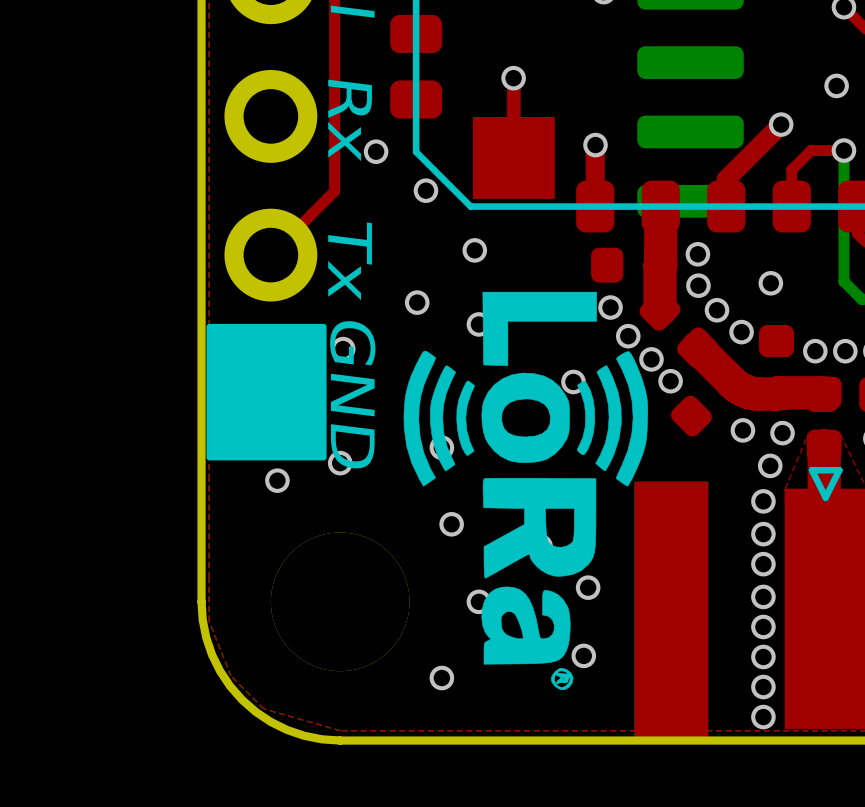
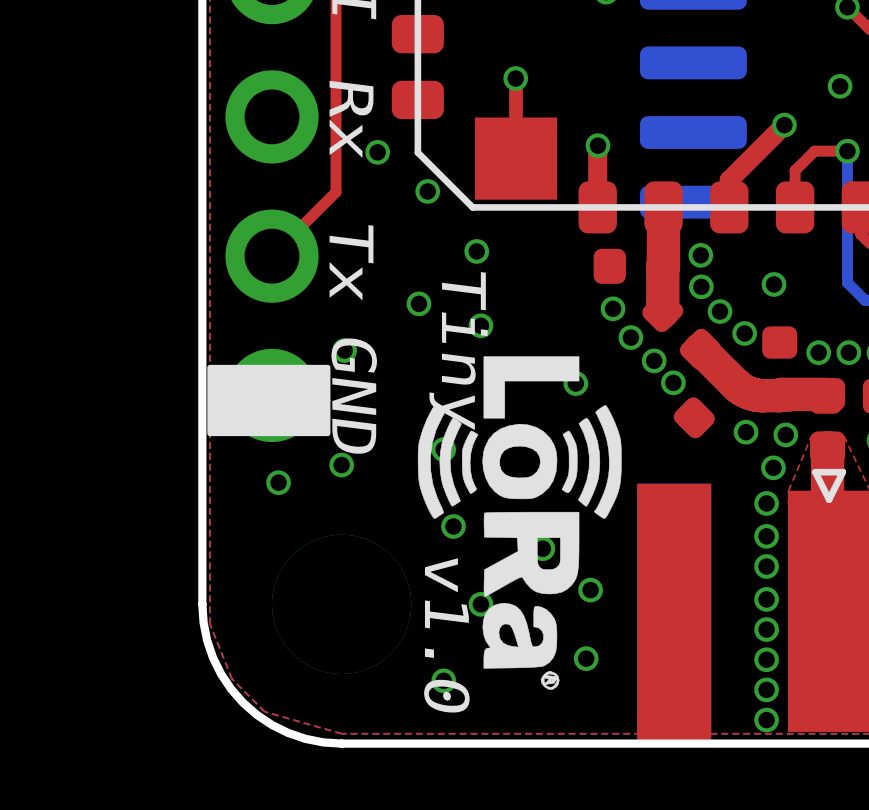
drawing shape: [403, 291, 649, 691] -> [417, 356, 622, 690]
drawing shape: [206, 323, 327, 461] -> [207, 364, 331, 437]
text: none -> Tiny (458, 351)
text: none -> v1.0 (446, 635)

